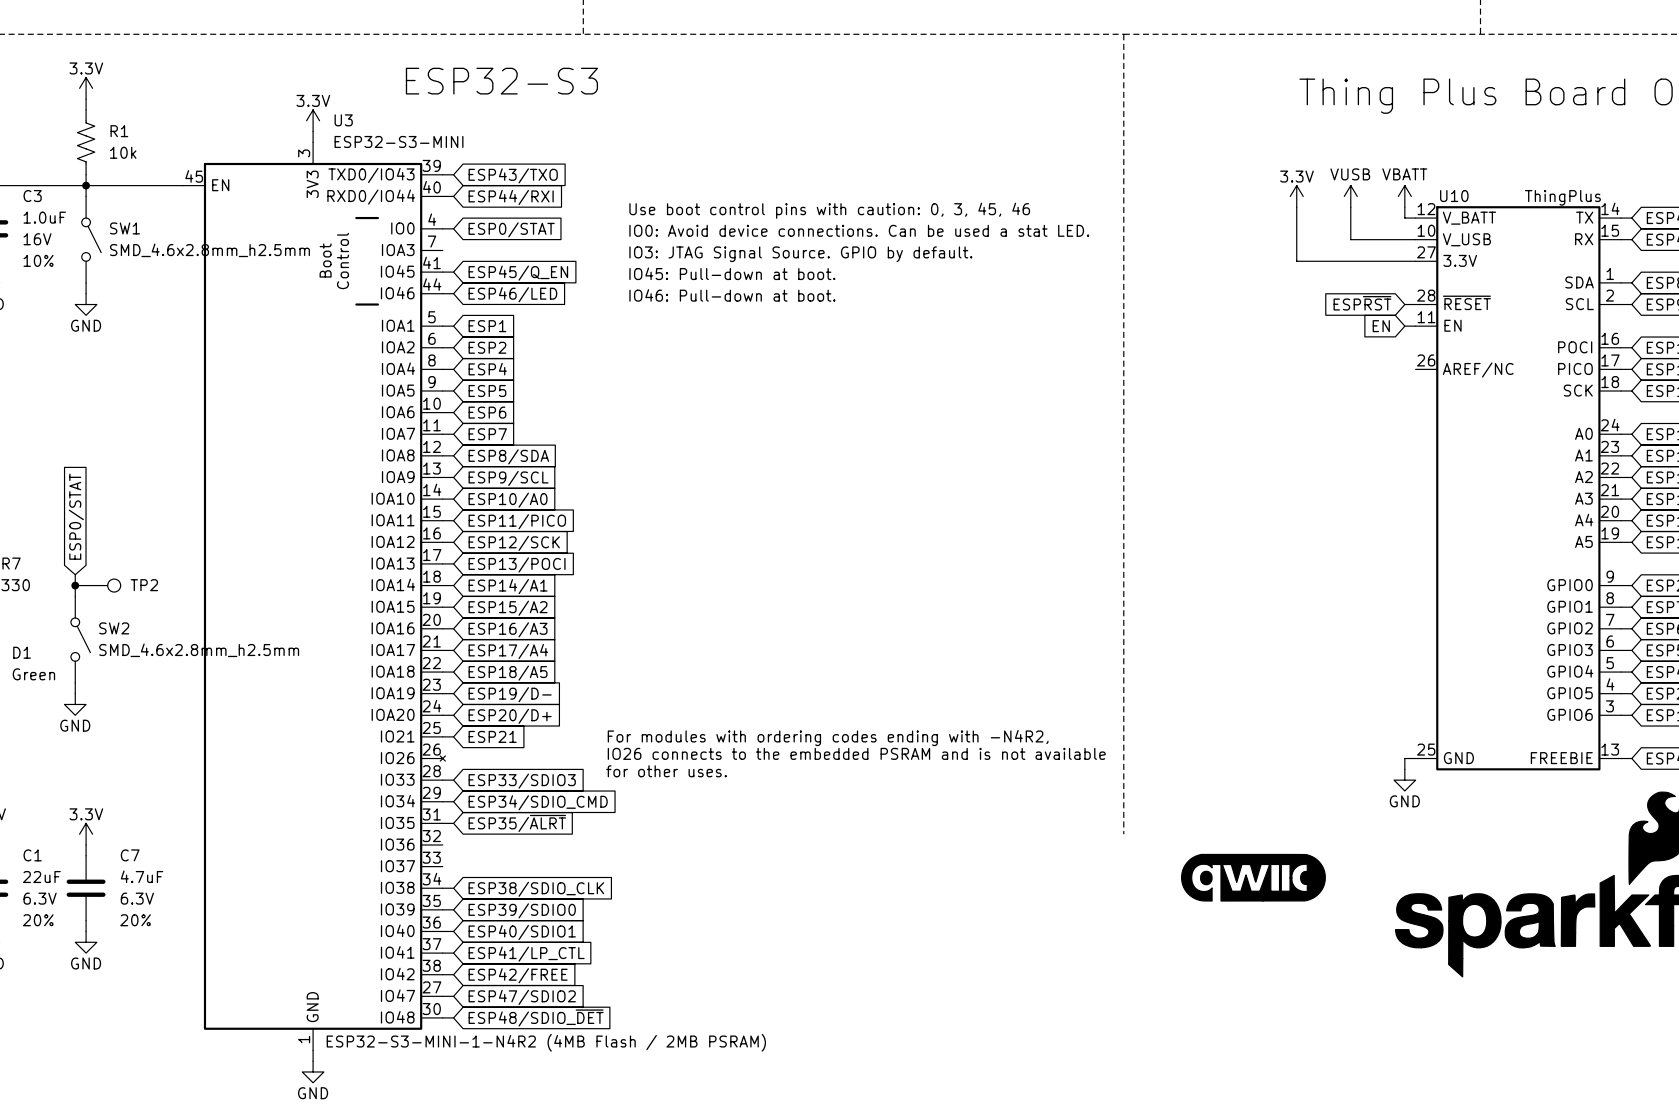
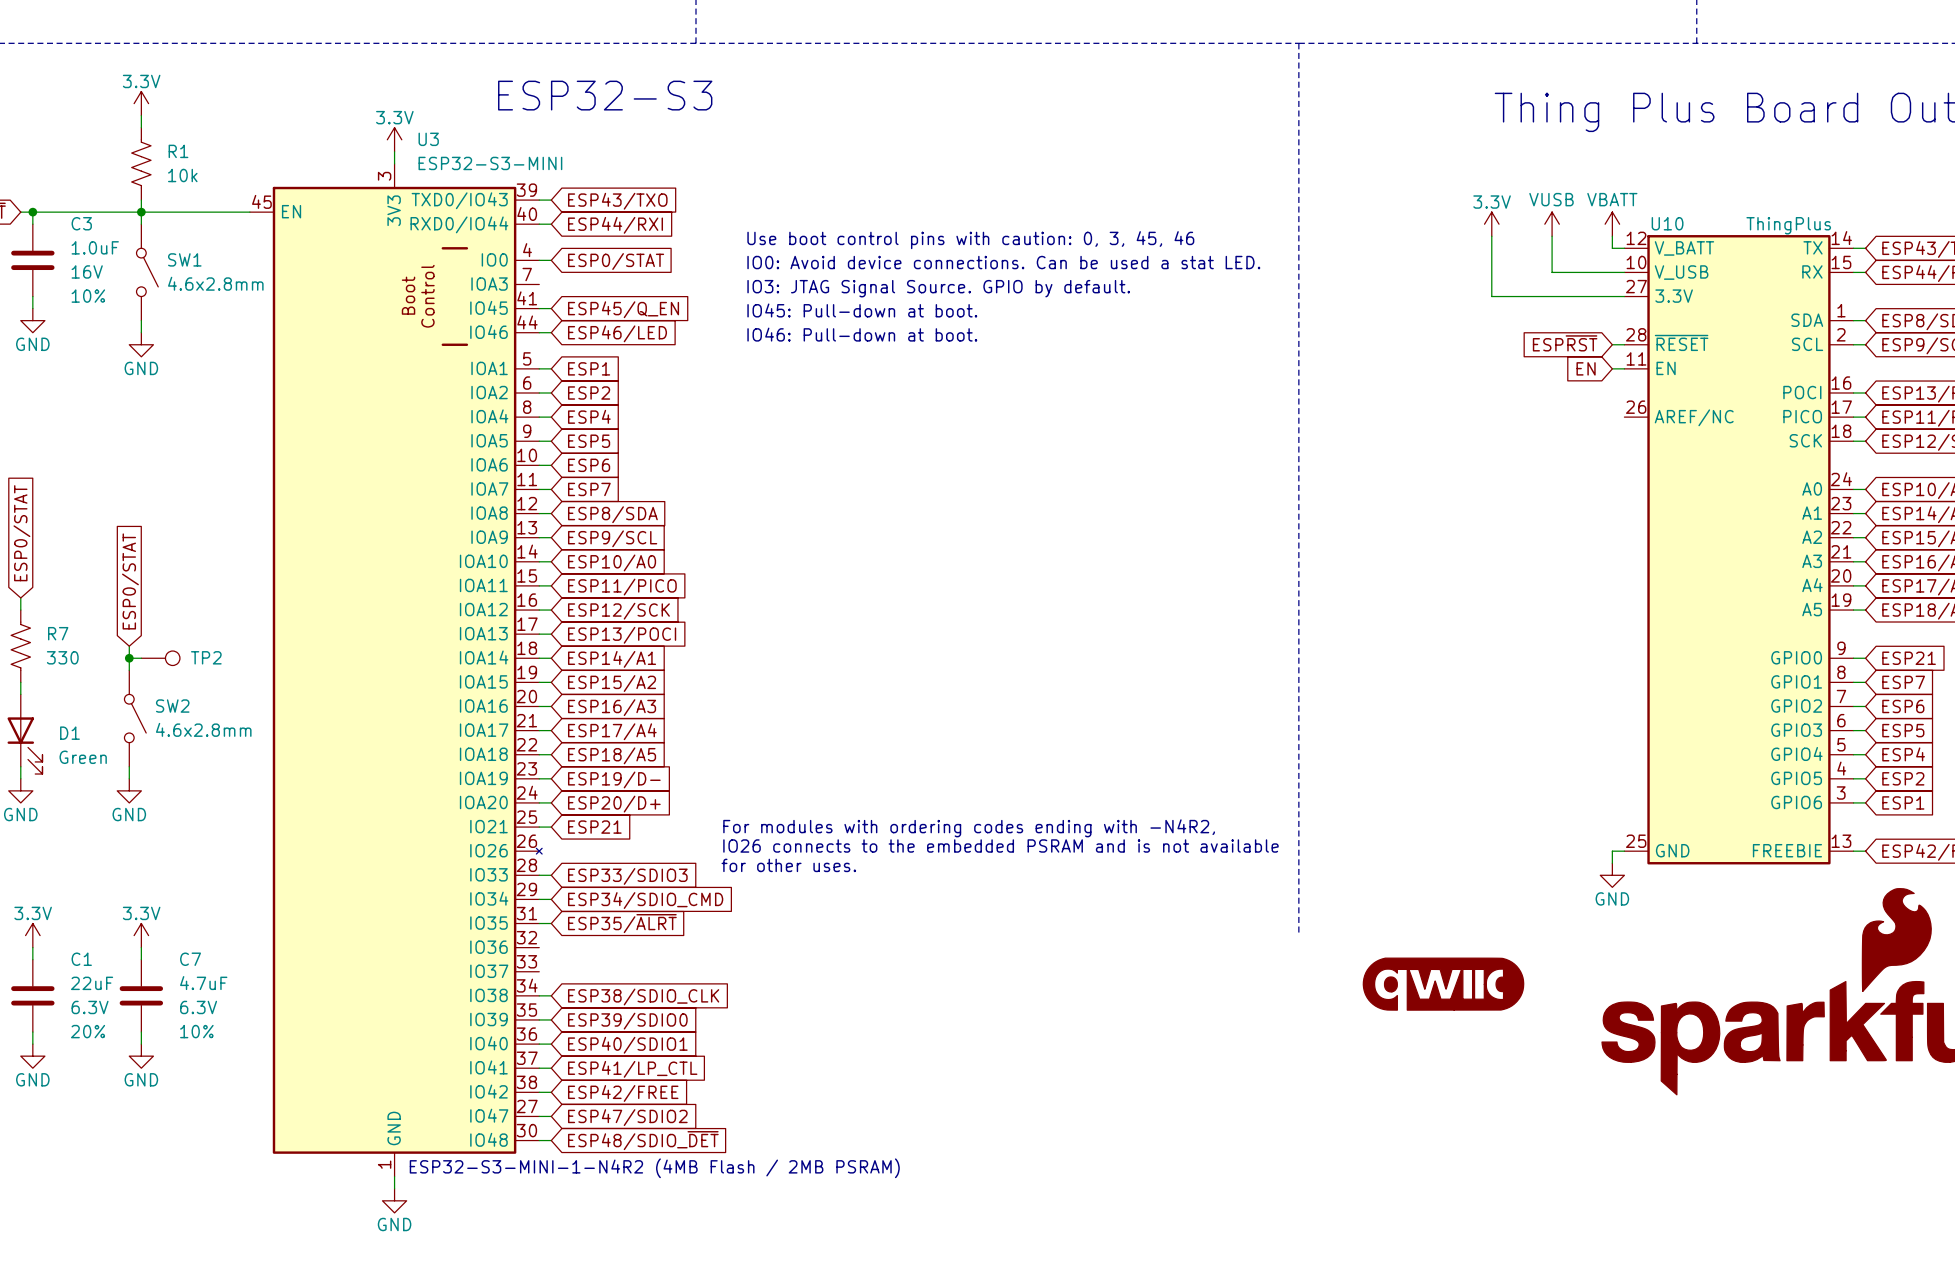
SW1 value: SMD_4.6x2.8mm_h2.5mm (209, 250) -> 4.6x2.8mm (215, 283)
SW2 value: SMD_4.6x2.8mm_h2.5mm (199, 650) -> 4.6x2.8mm (203, 729)
C7 text: 20% (135, 920) -> 10% (196, 1031)

